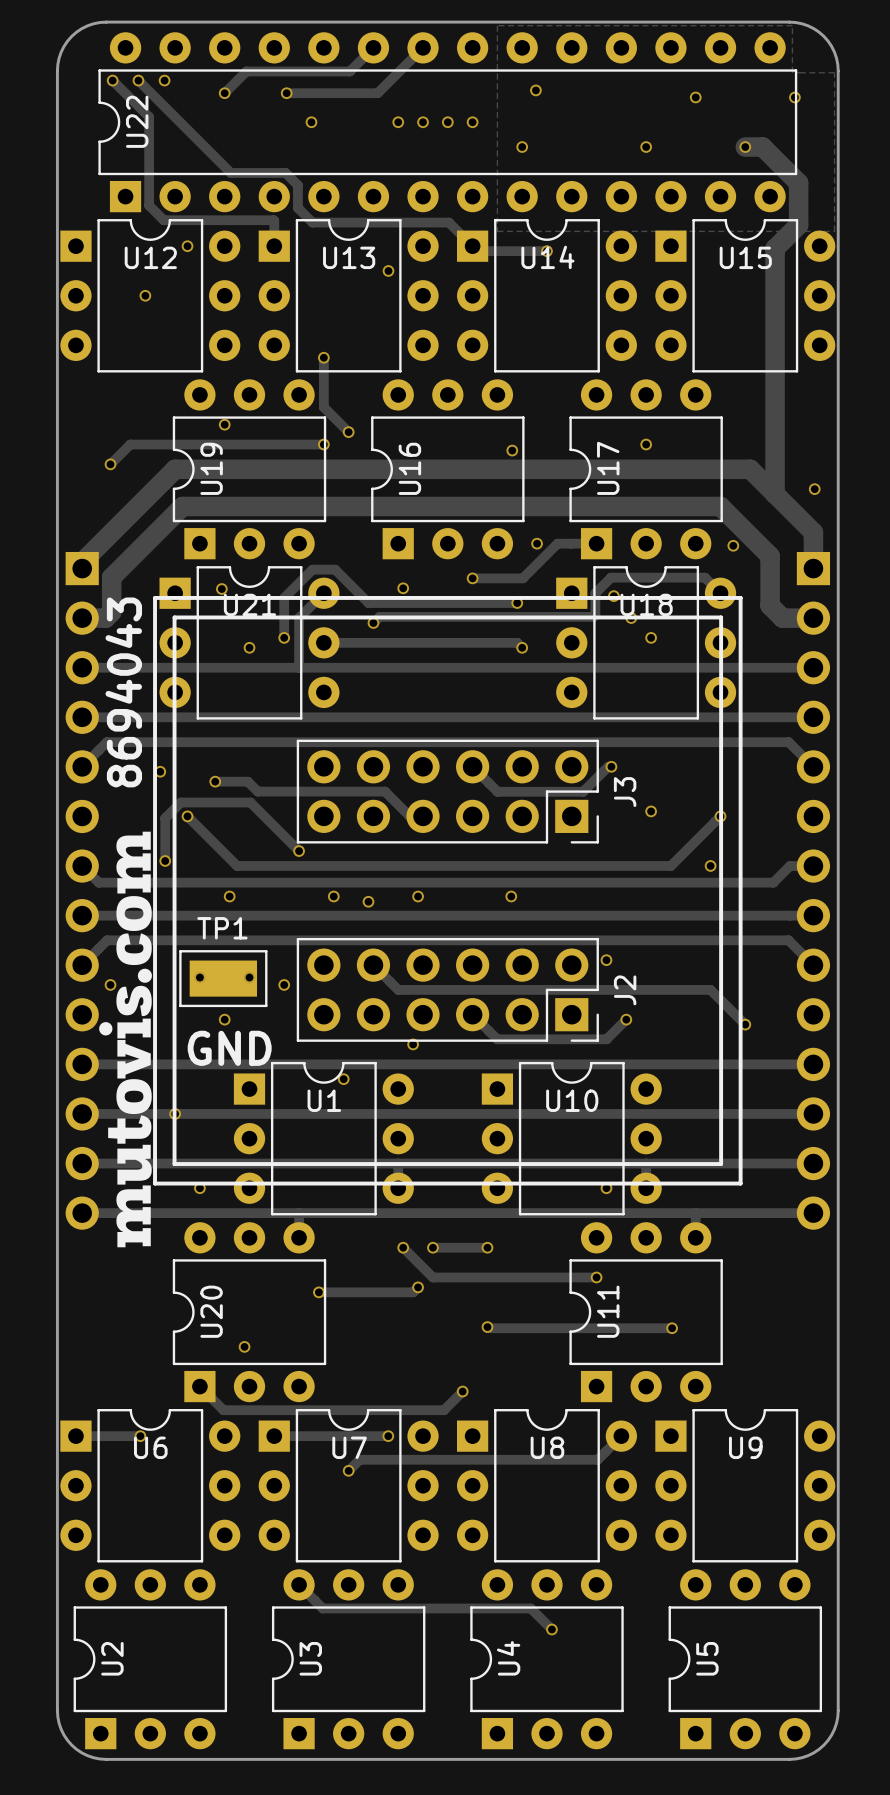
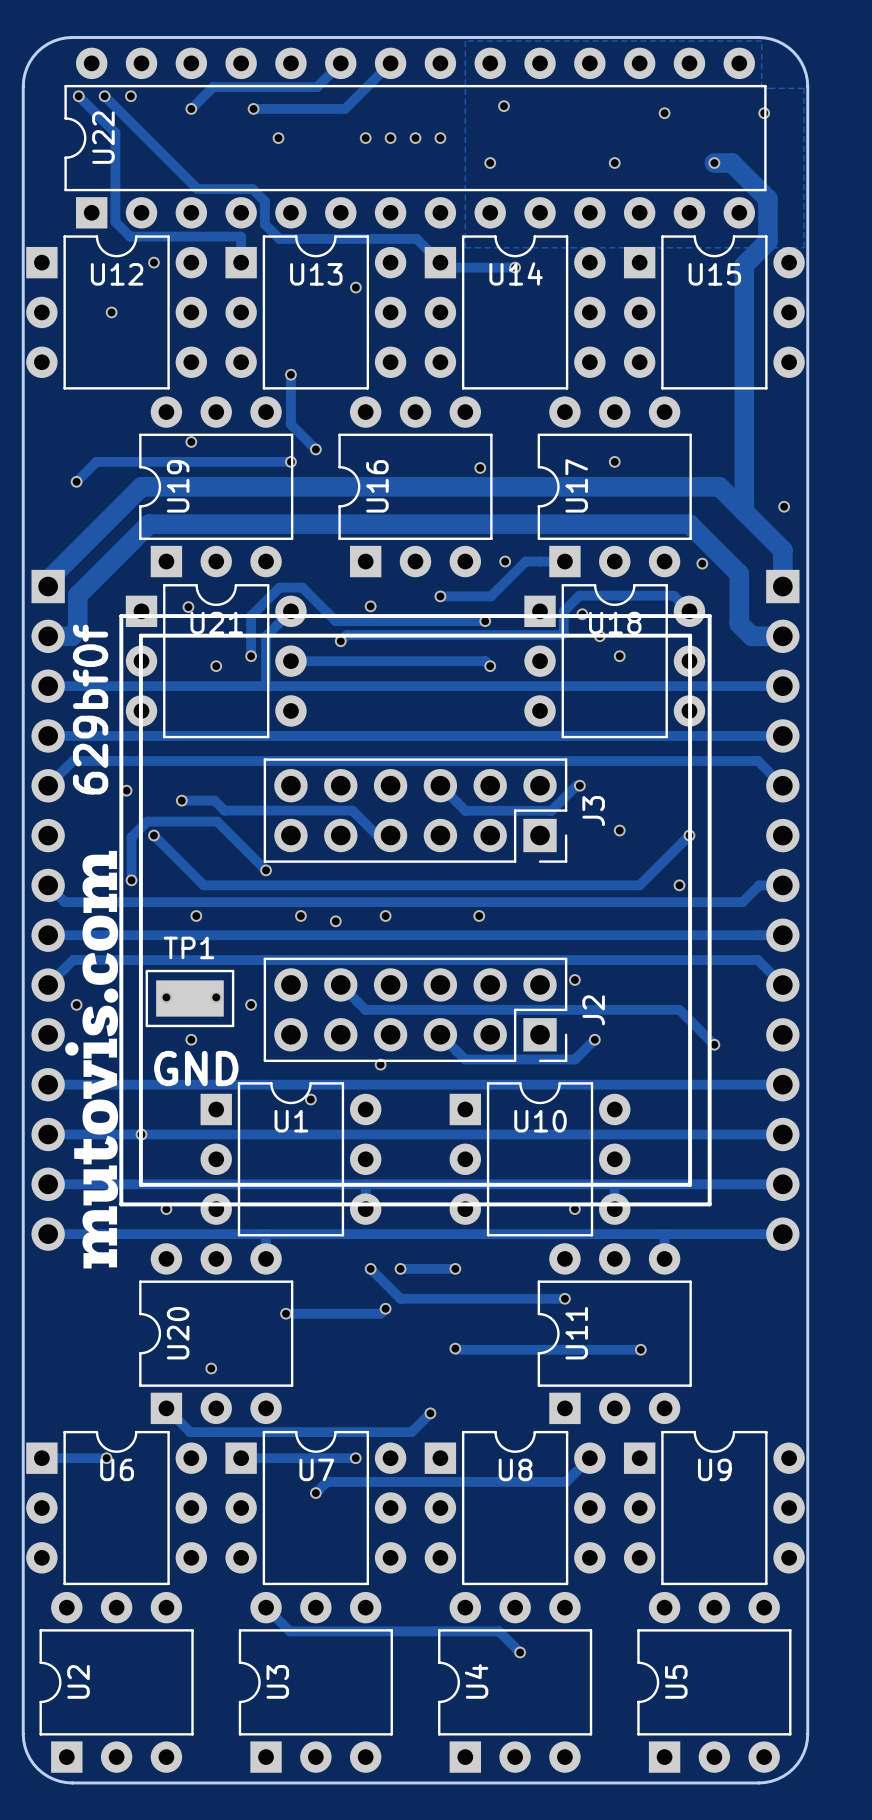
text: 8694043 (123, 692) -> 629bf0f (90, 709)

